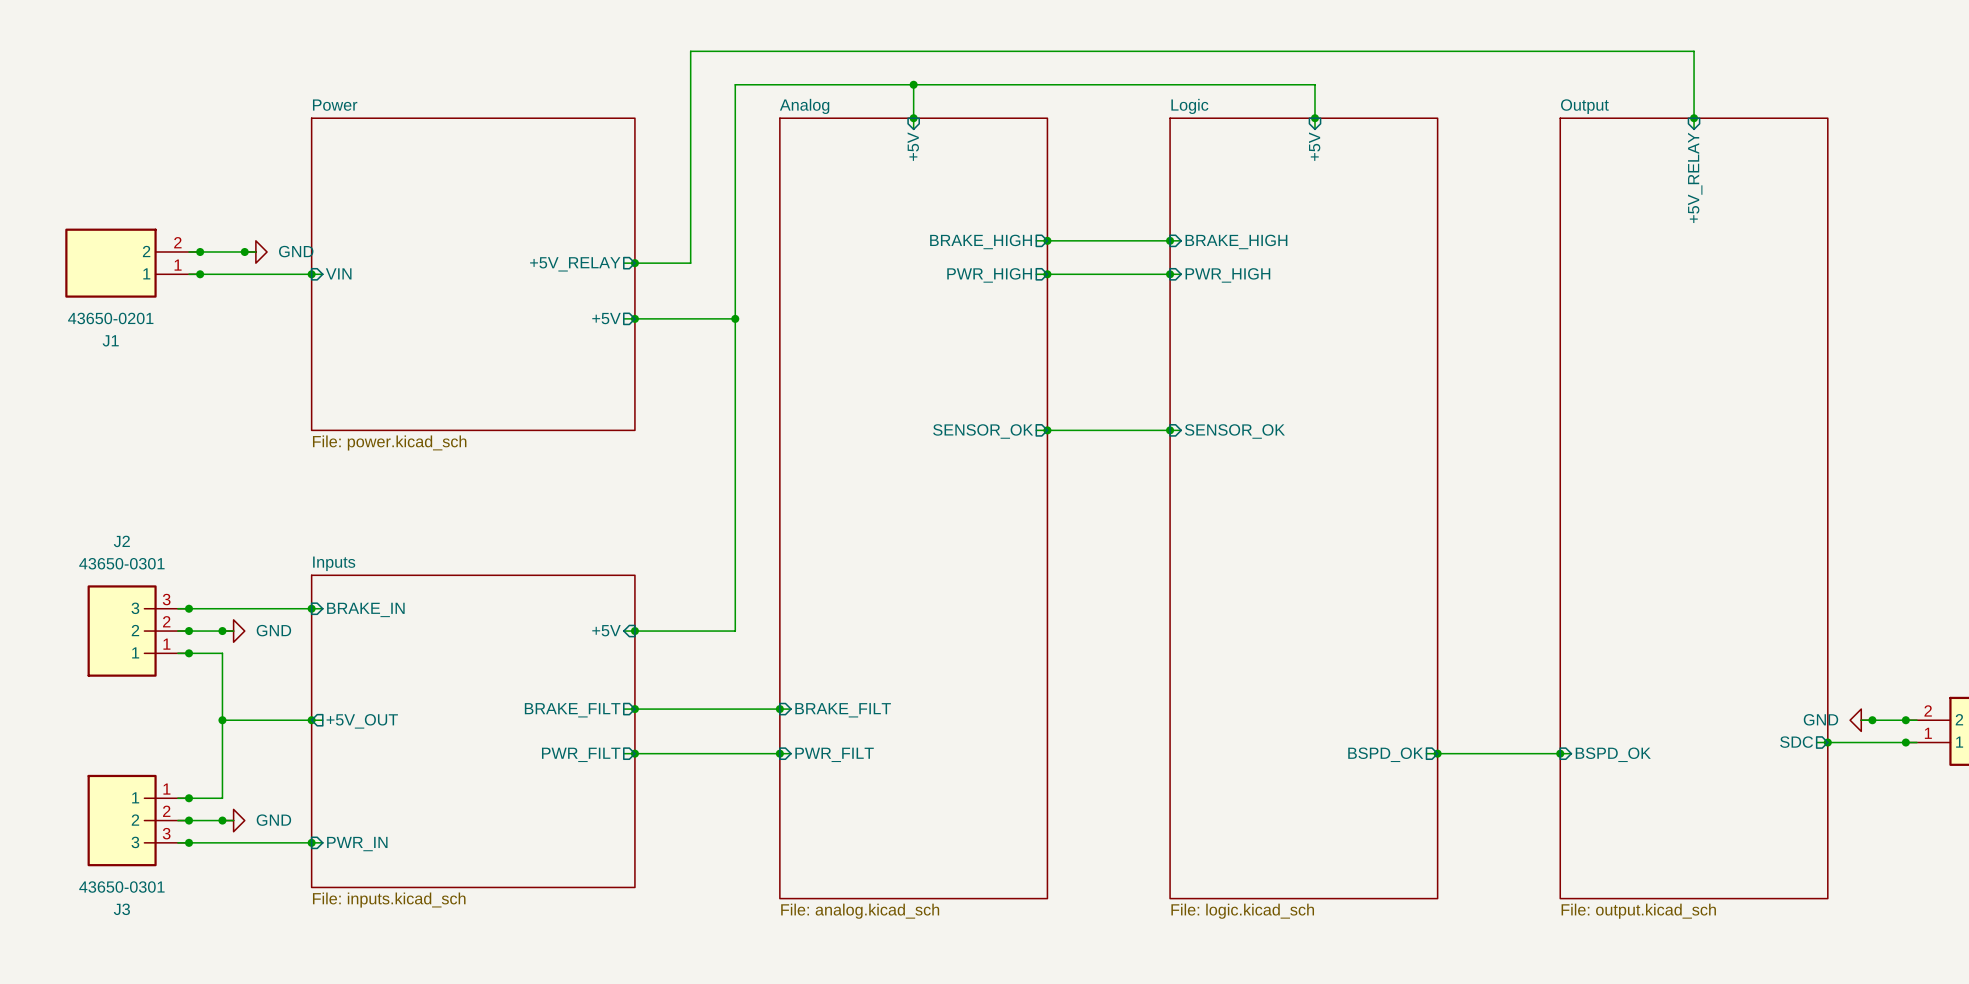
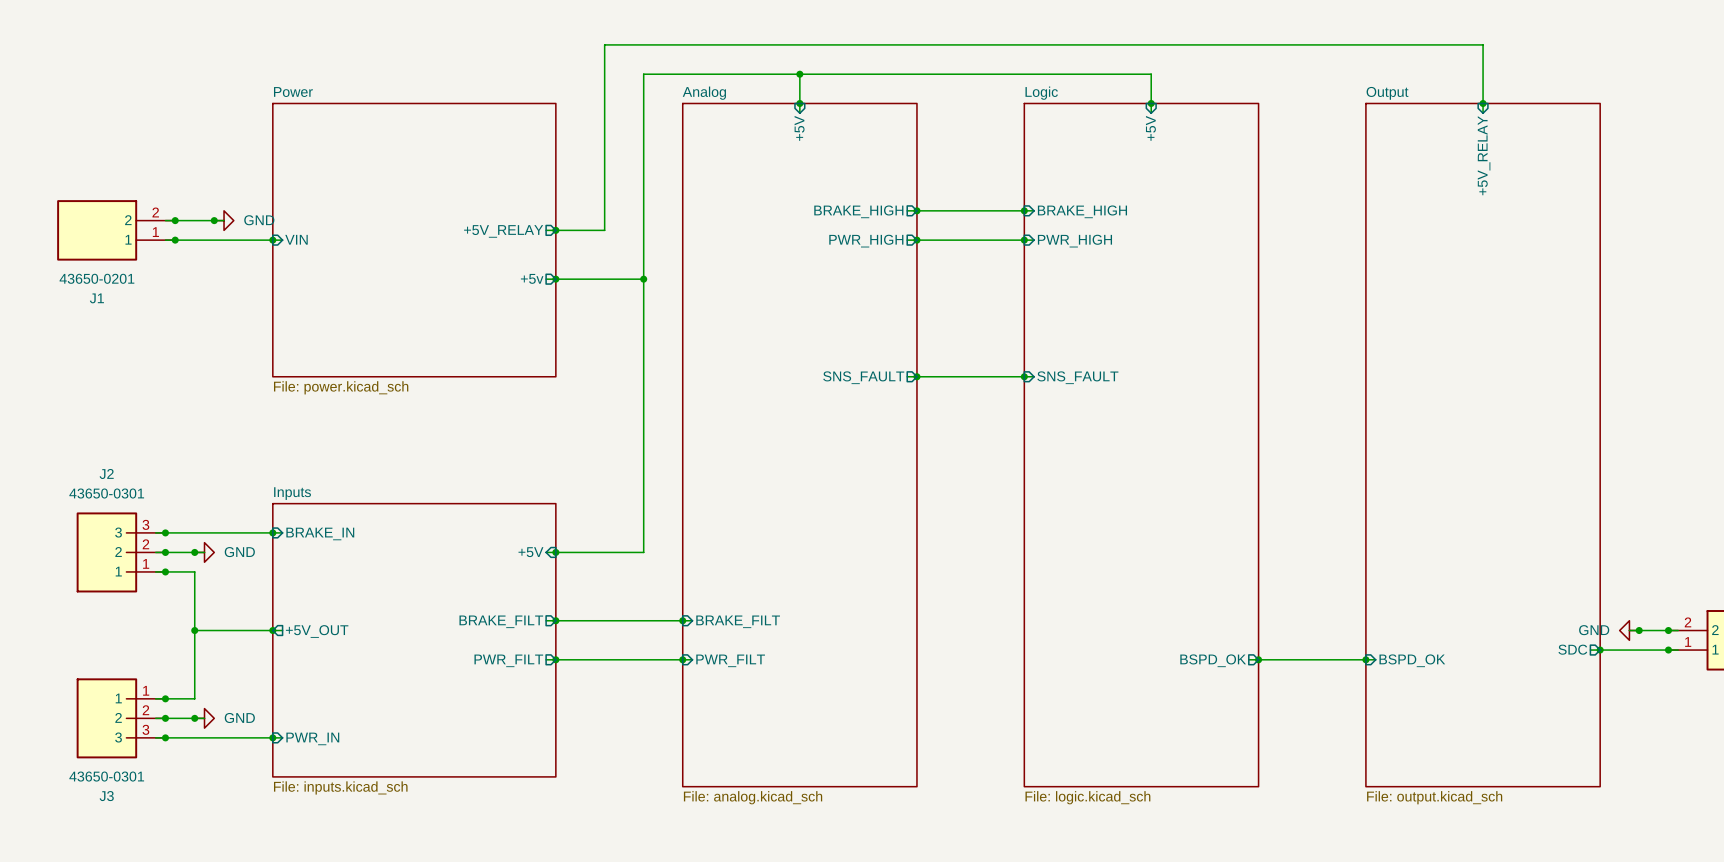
sheet pin: +5V (606, 318) -> +5v (532, 278)
sheet pin: SENSOR_OK (983, 431) -> SNS_FAULT (863, 377)
sheet pin: SENSOR_OK (1234, 431) -> SNS_FAULT (1077, 377)

